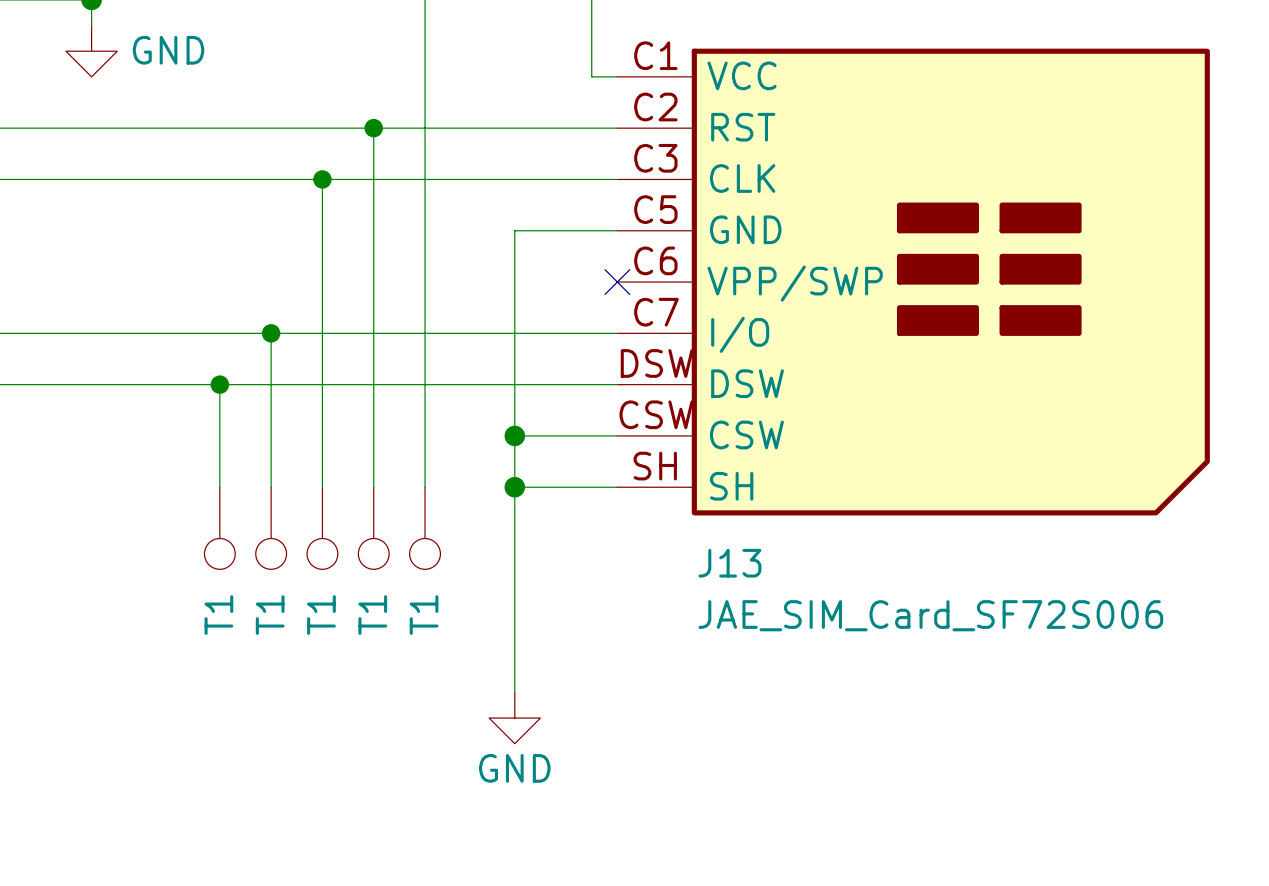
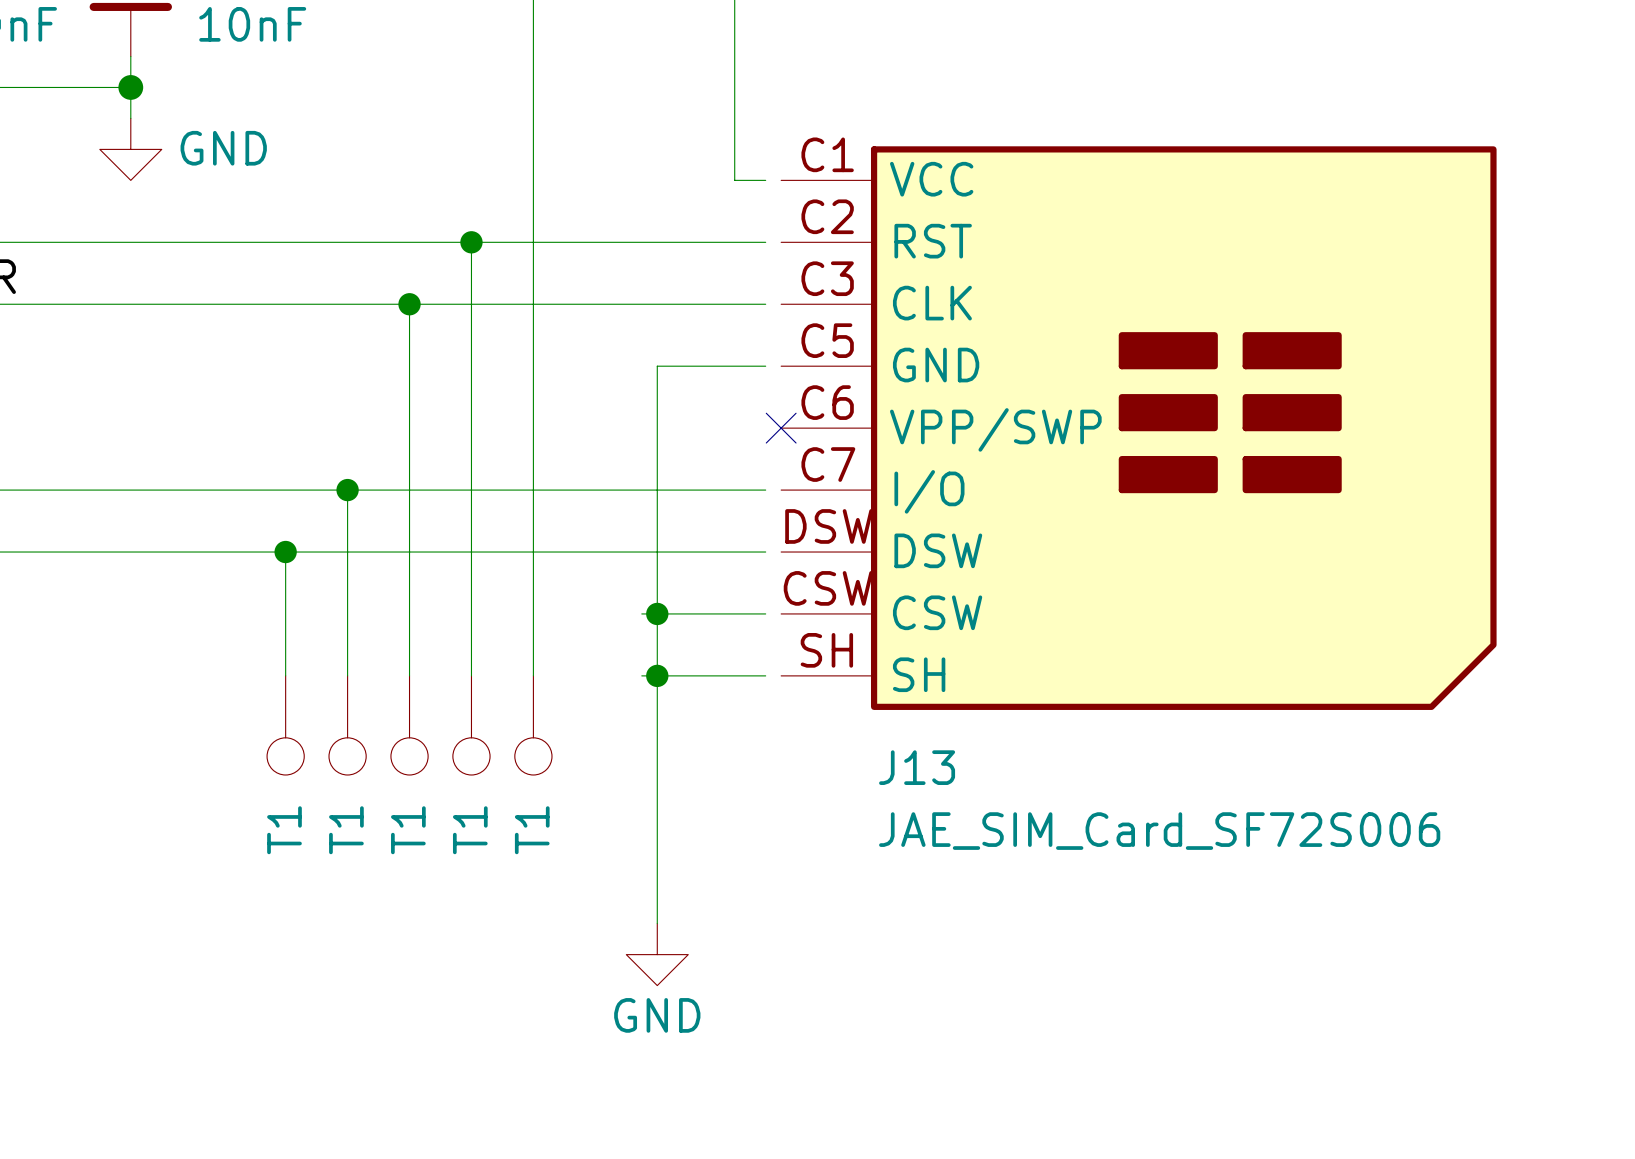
wire: (527, 230) (514, 230) (514, 692) -> (657, 366) (657, 923)
no-connect mark position: (617, 282) -> (781, 428)
J13 position: (913, 282) -> (1138, 428)
junction position: (514, 435) -> (657, 613)
junction position: (514, 487) -> (657, 675)
power symbol position: GND (514, 718) -> GND (657, 954)

